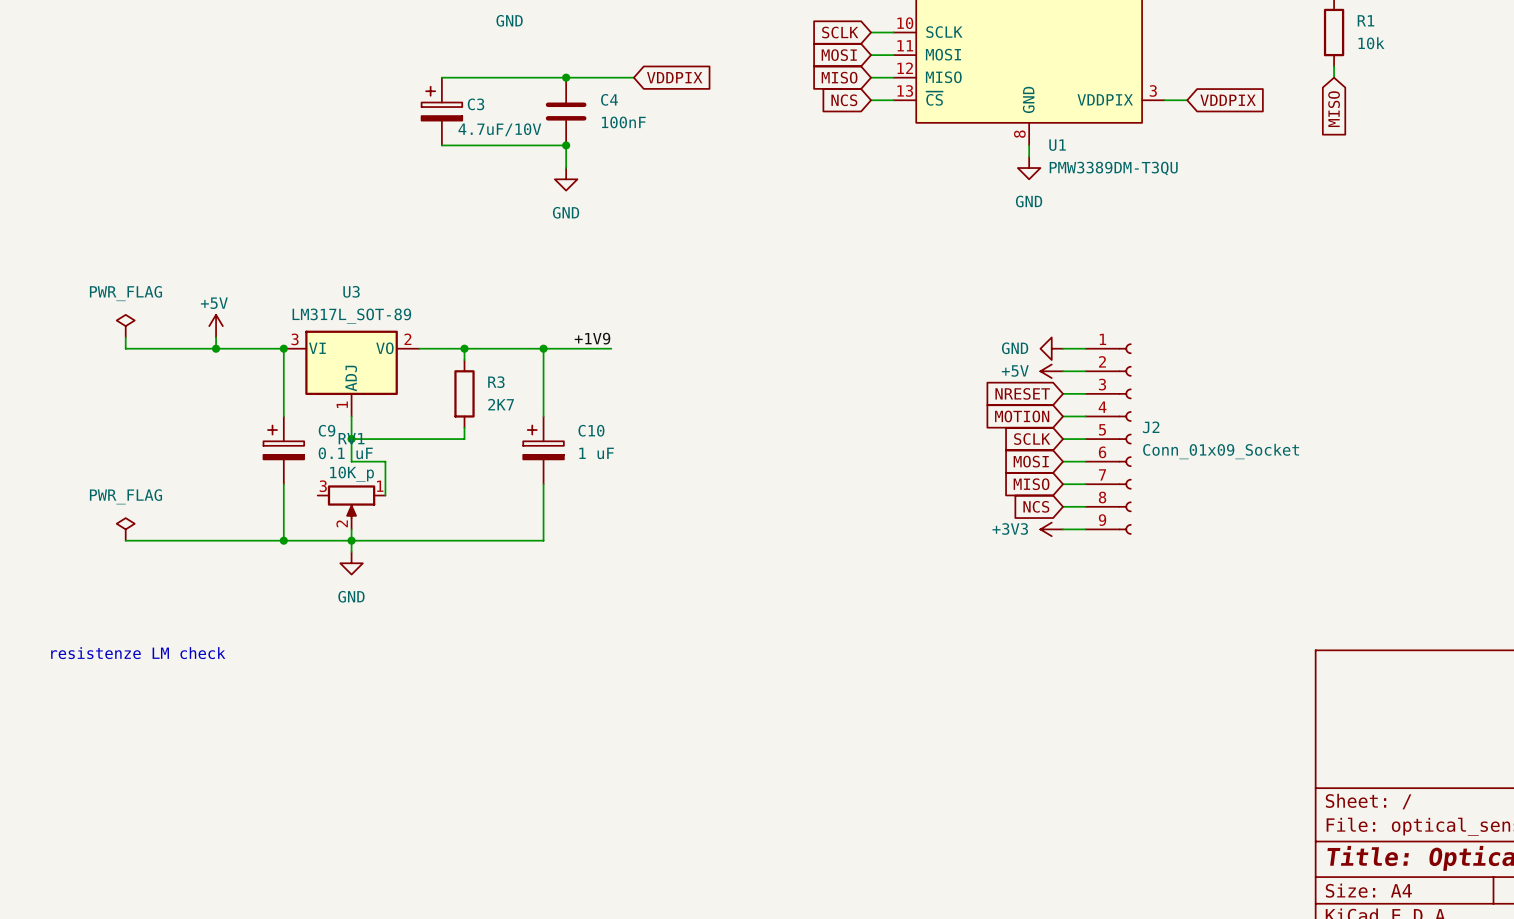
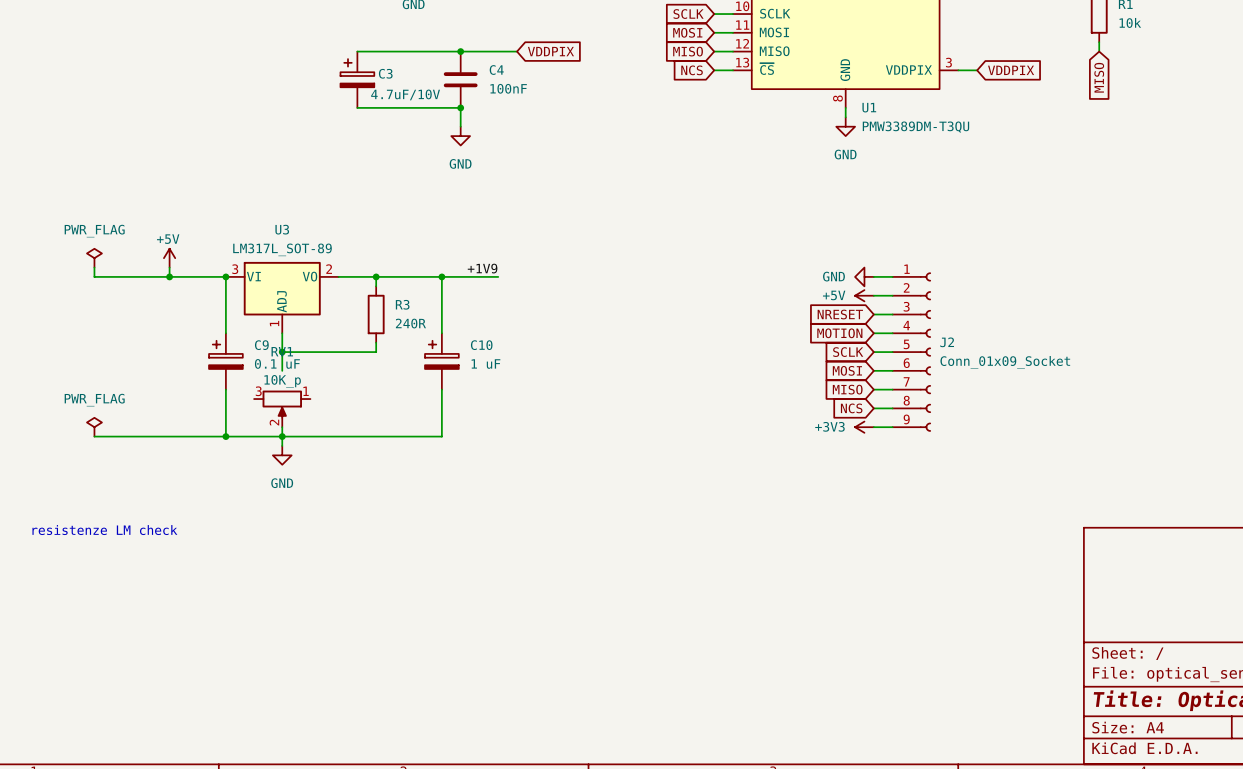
R3 value: 2K7 (501, 404) -> 240R (410, 323)
wire: (351, 461) (385, 461) (385, 495) -> none

